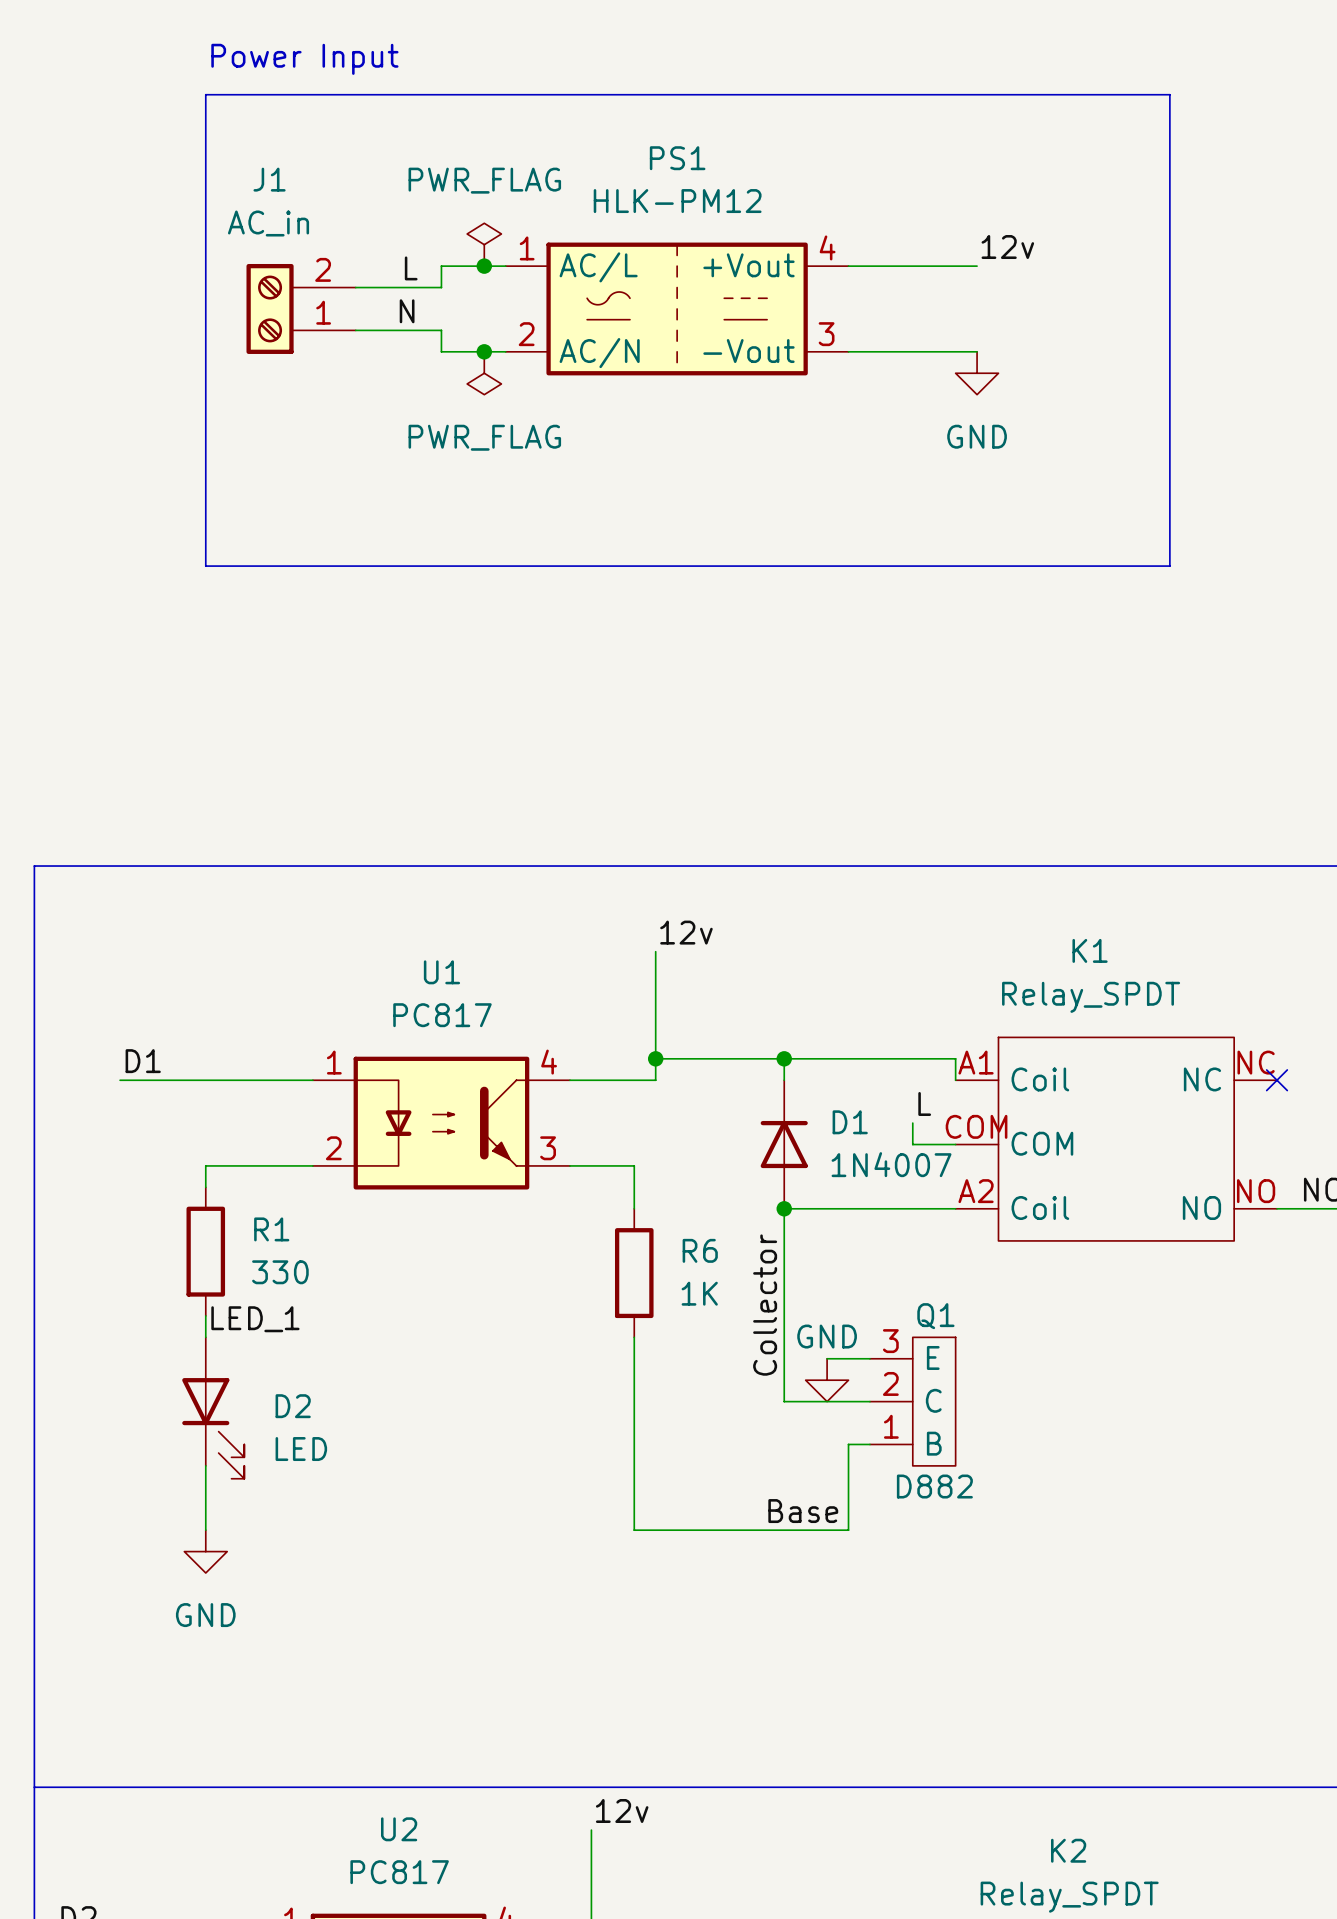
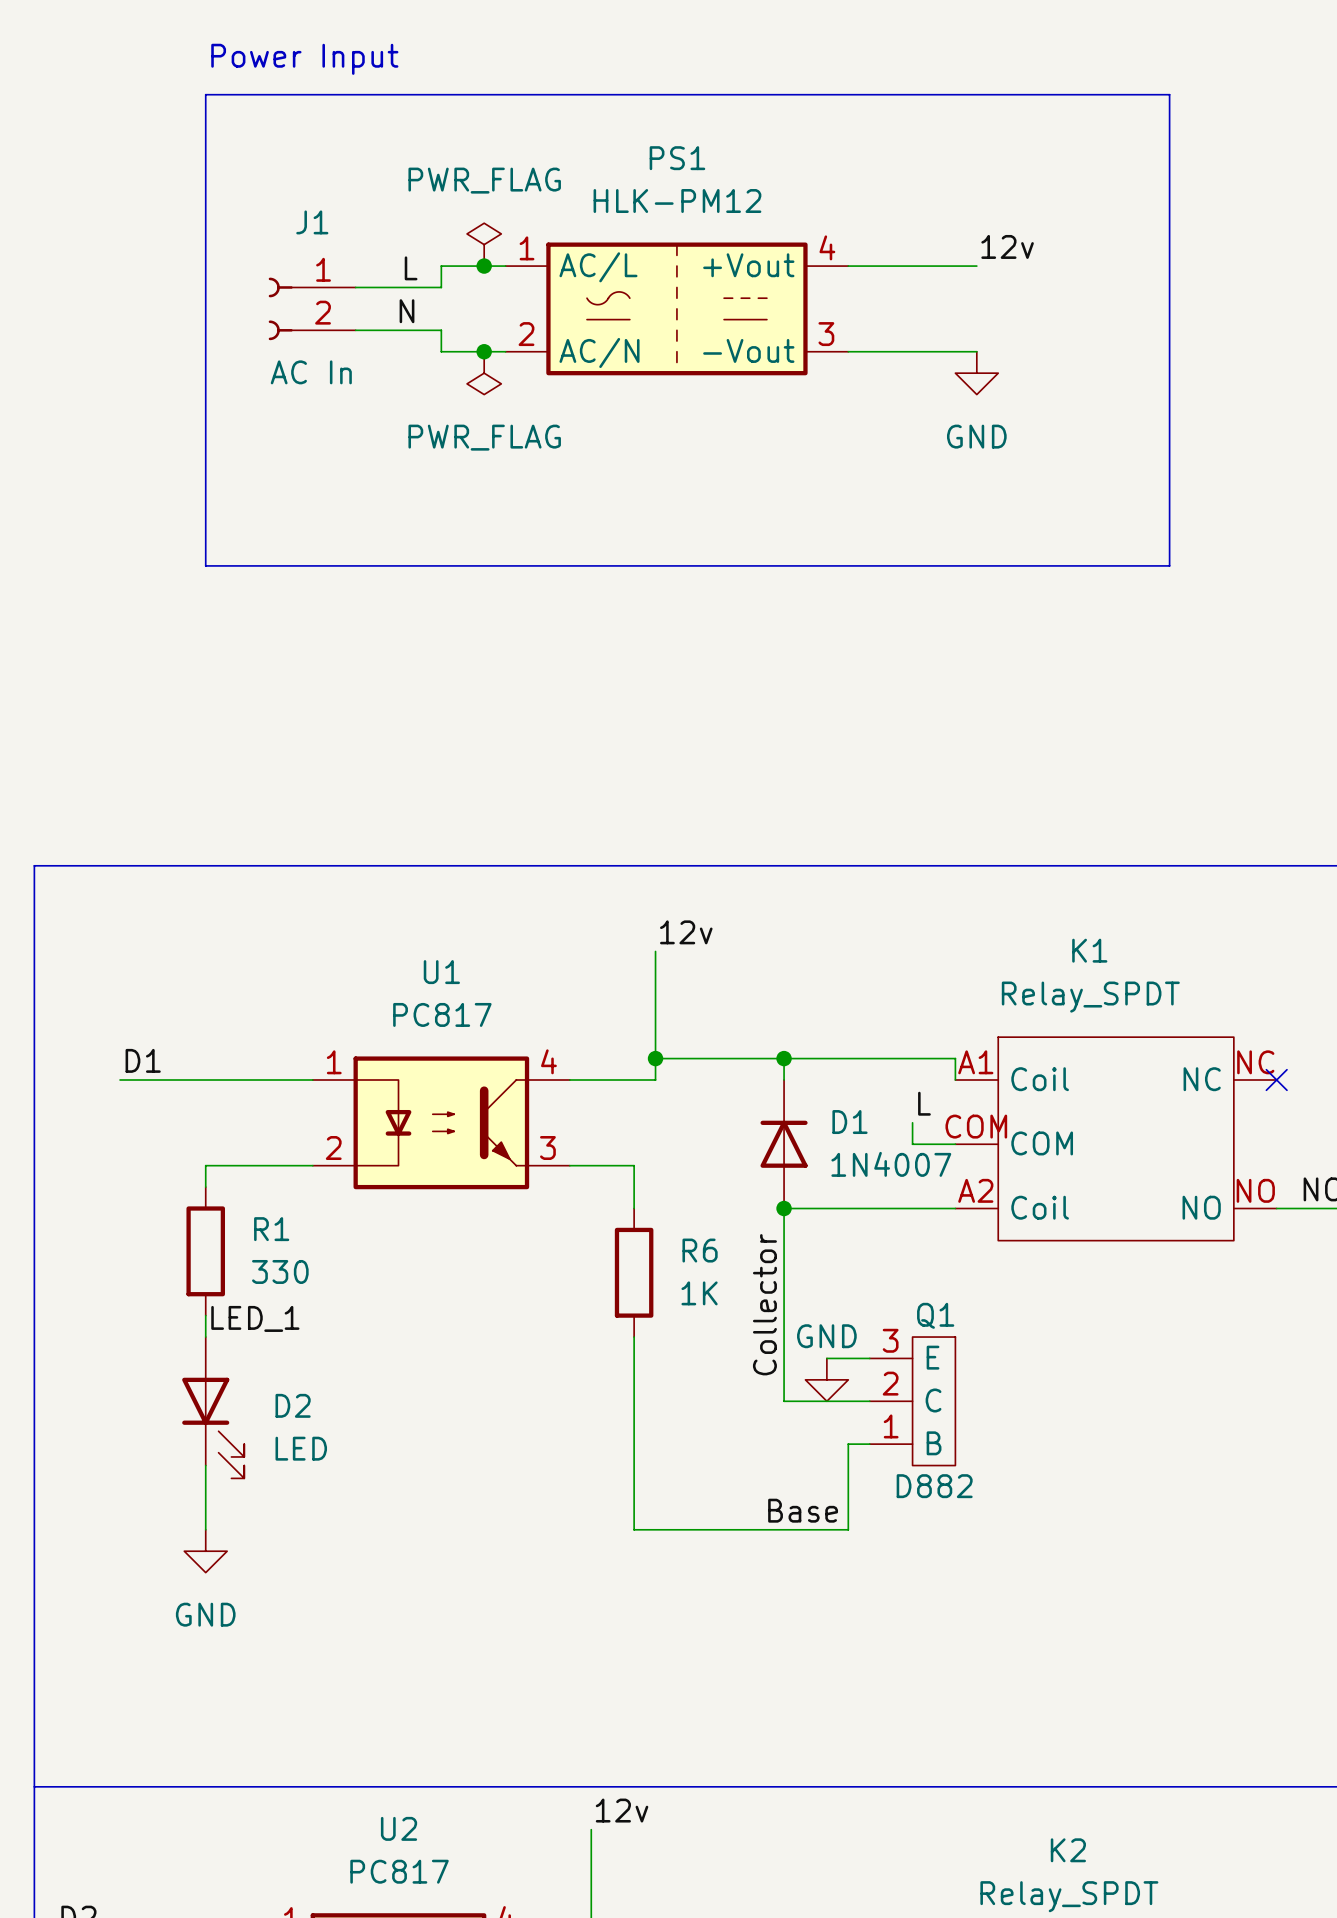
J1 name position: J1 (269, 179) -> J1 (312, 222)
J1 value: AC_in (268, 223) -> AC In (311, 372)
J1 symbol: [246, 263, 356, 354] -> [268, 277, 356, 341]

